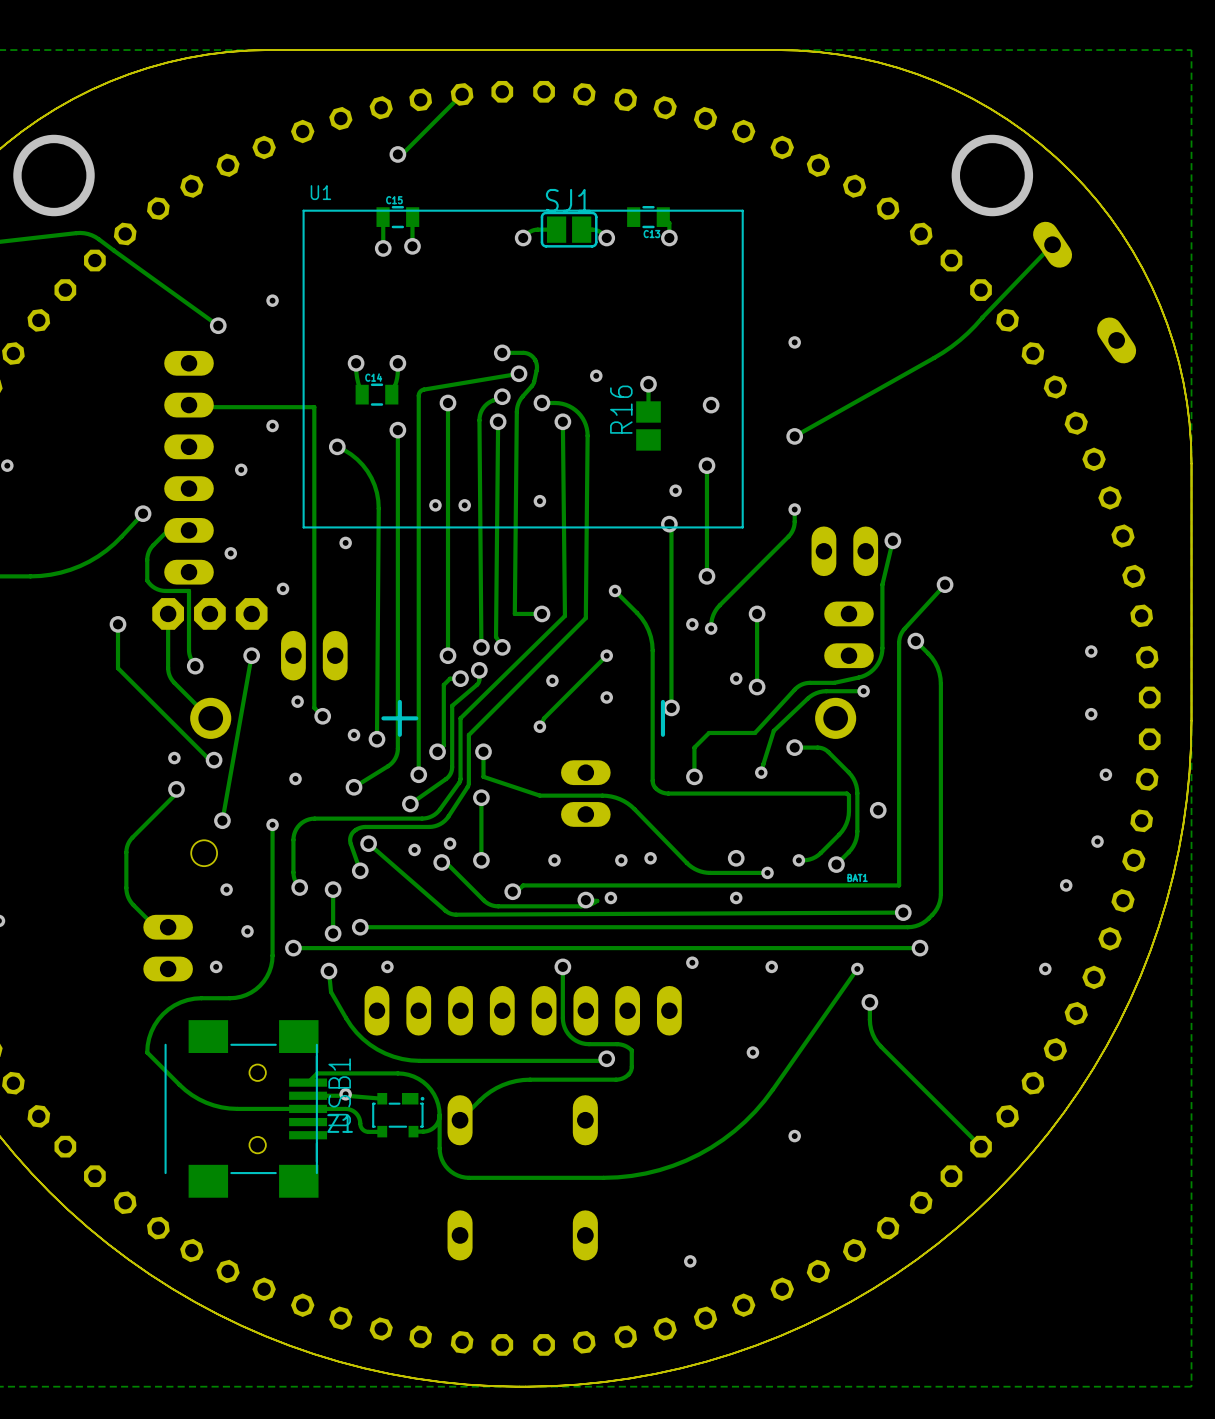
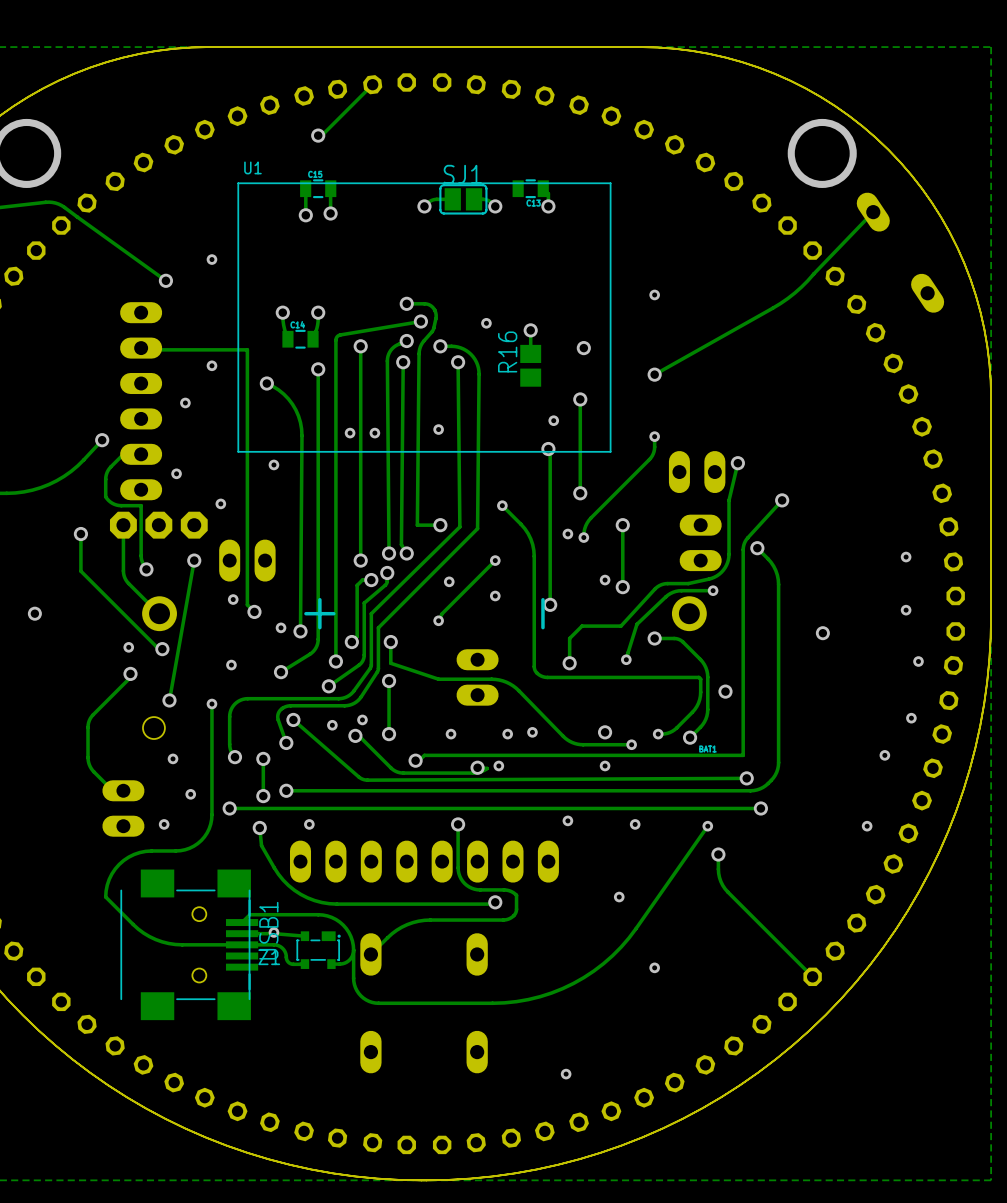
via: none -> (34, 613)
via: none -> (822, 633)

